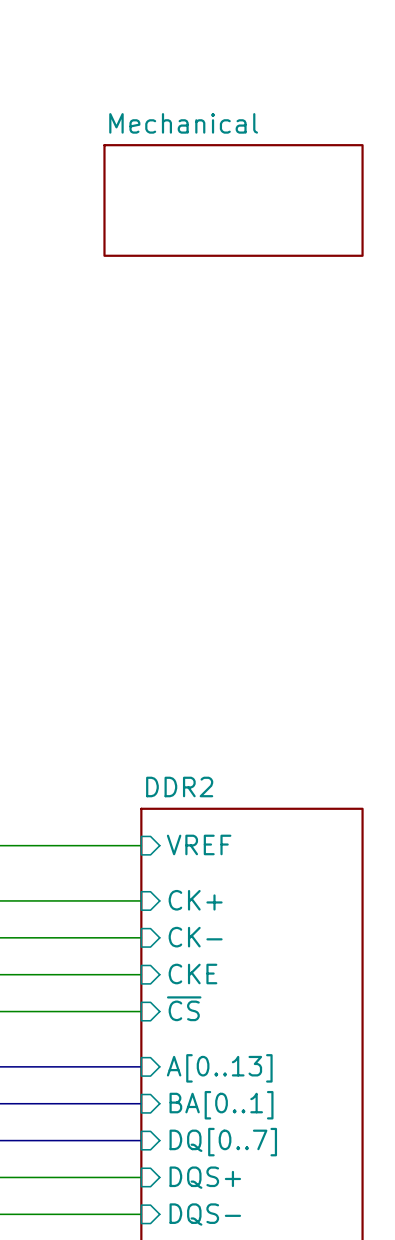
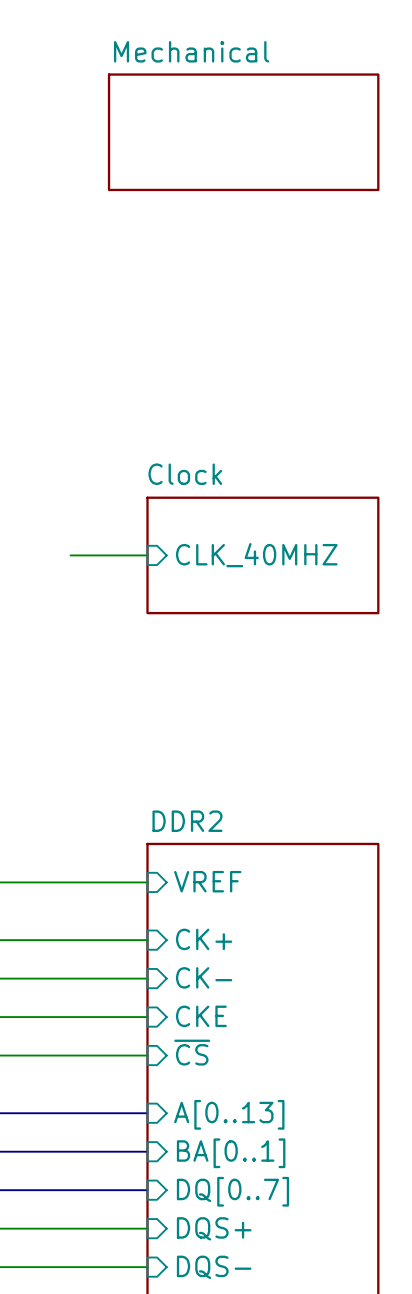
sheet Mechanical position: (233, 200) -> (243, 132)
wire: none -> (70, 555) (147, 555)
sheet pin: none -> CLK_40MHZ (256, 555)
sheet Clock: none -> (262, 555)

